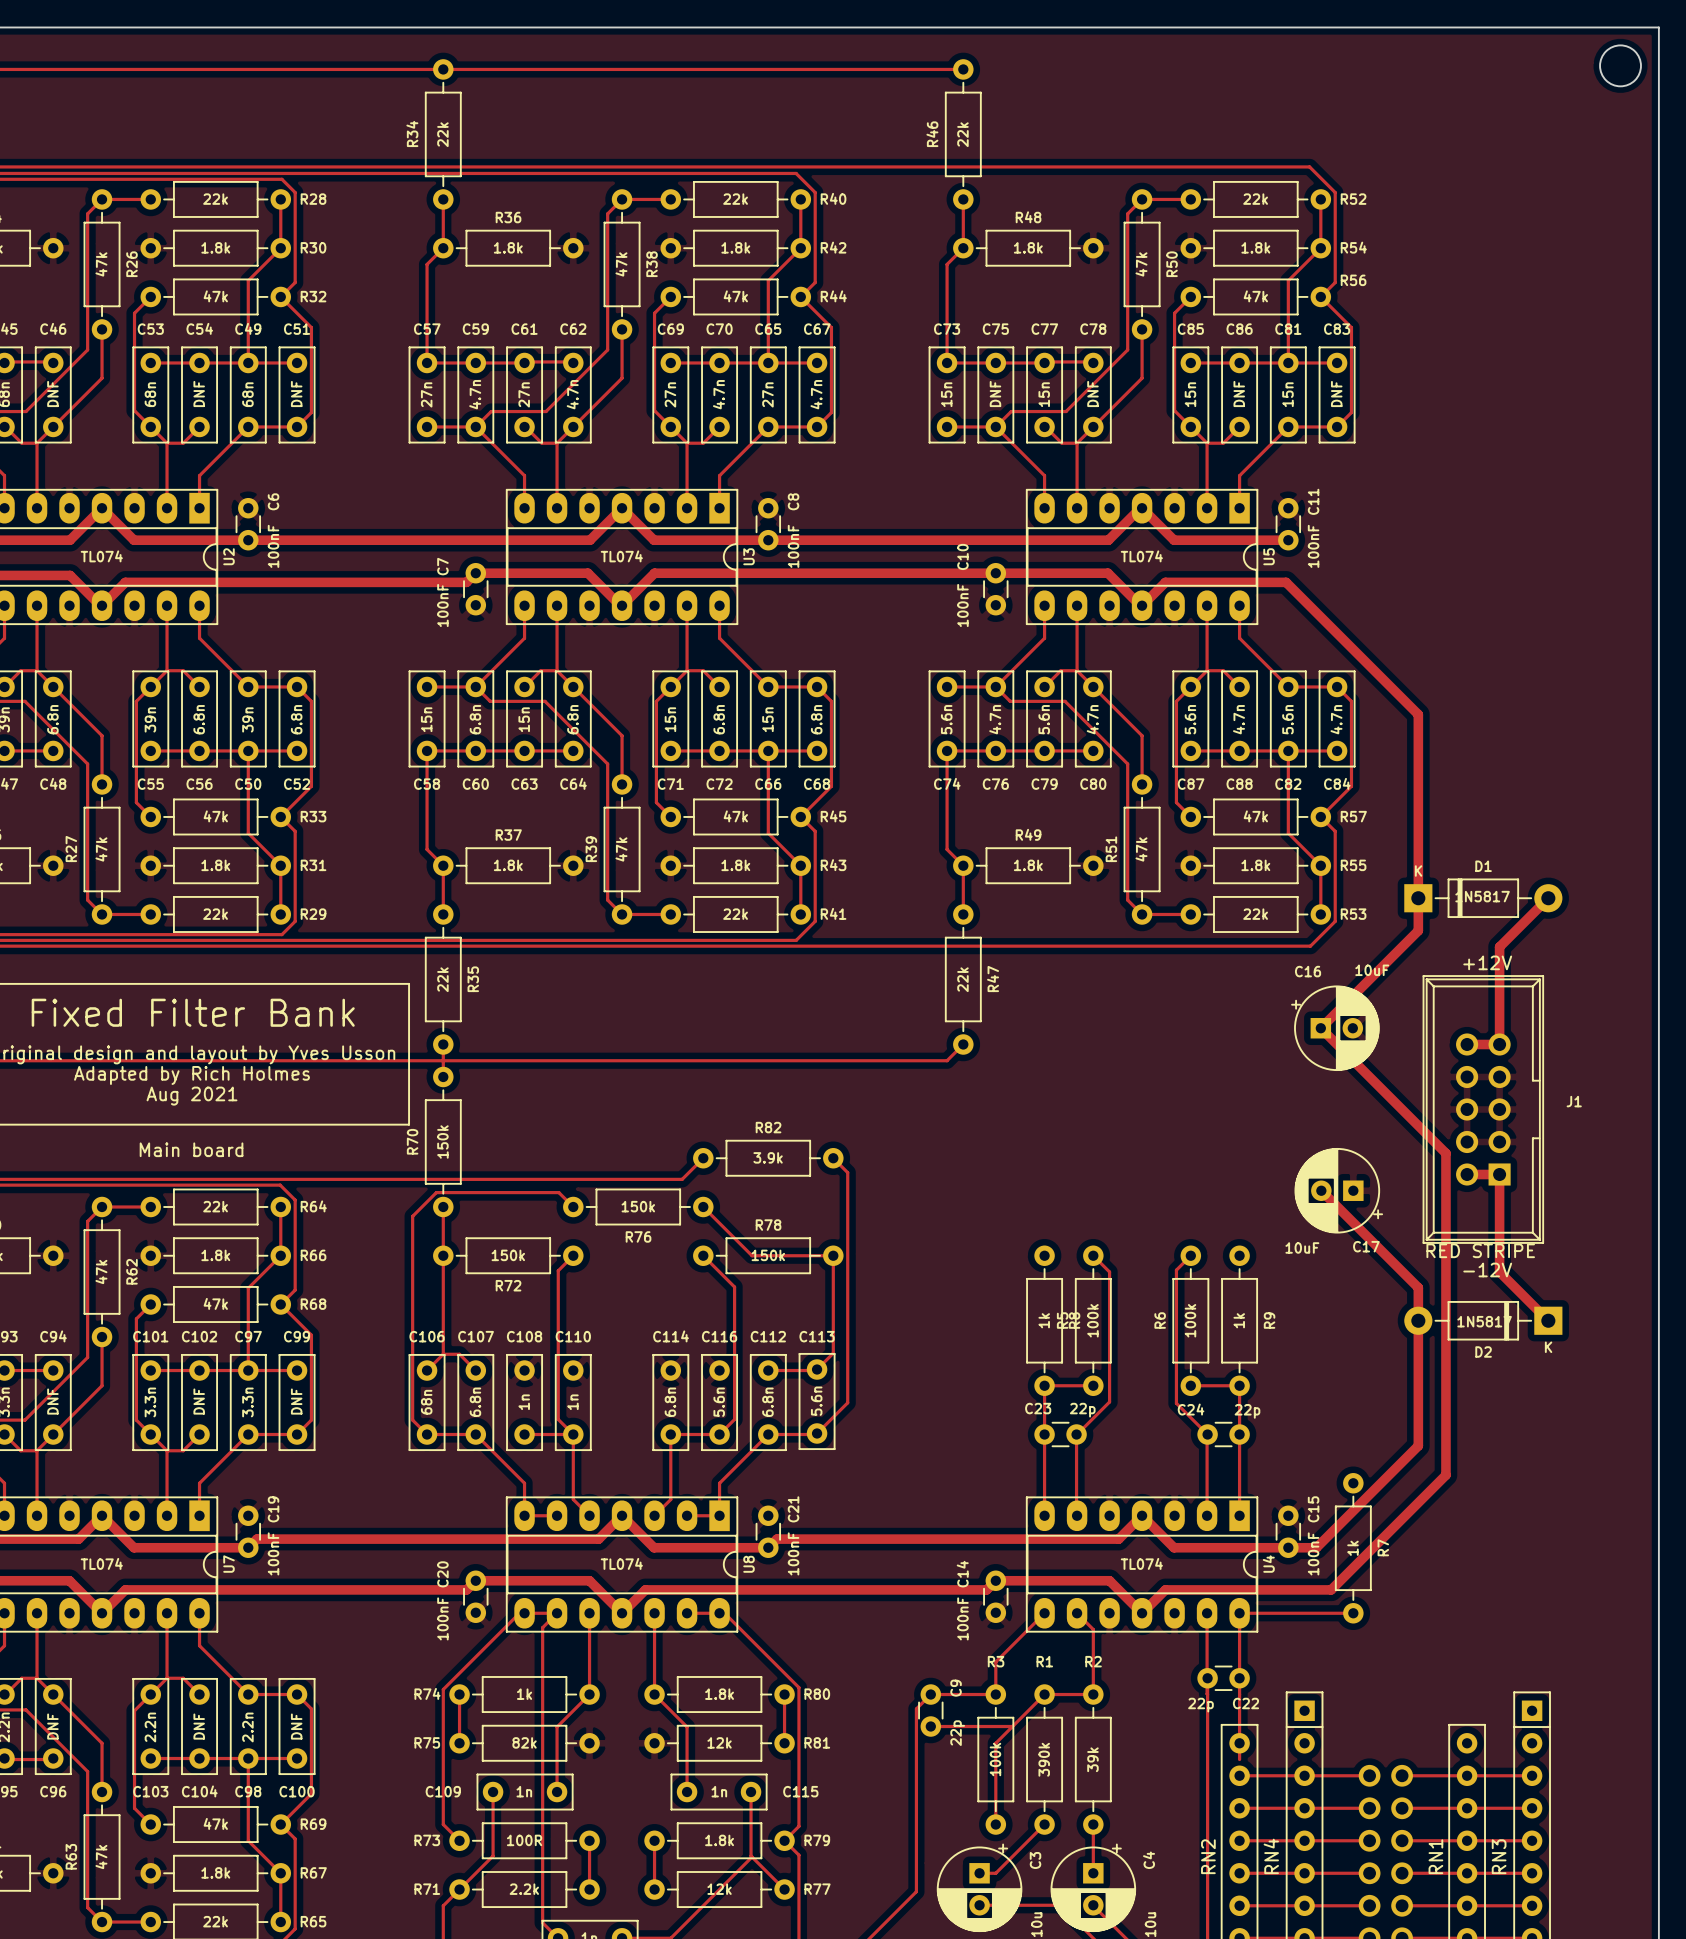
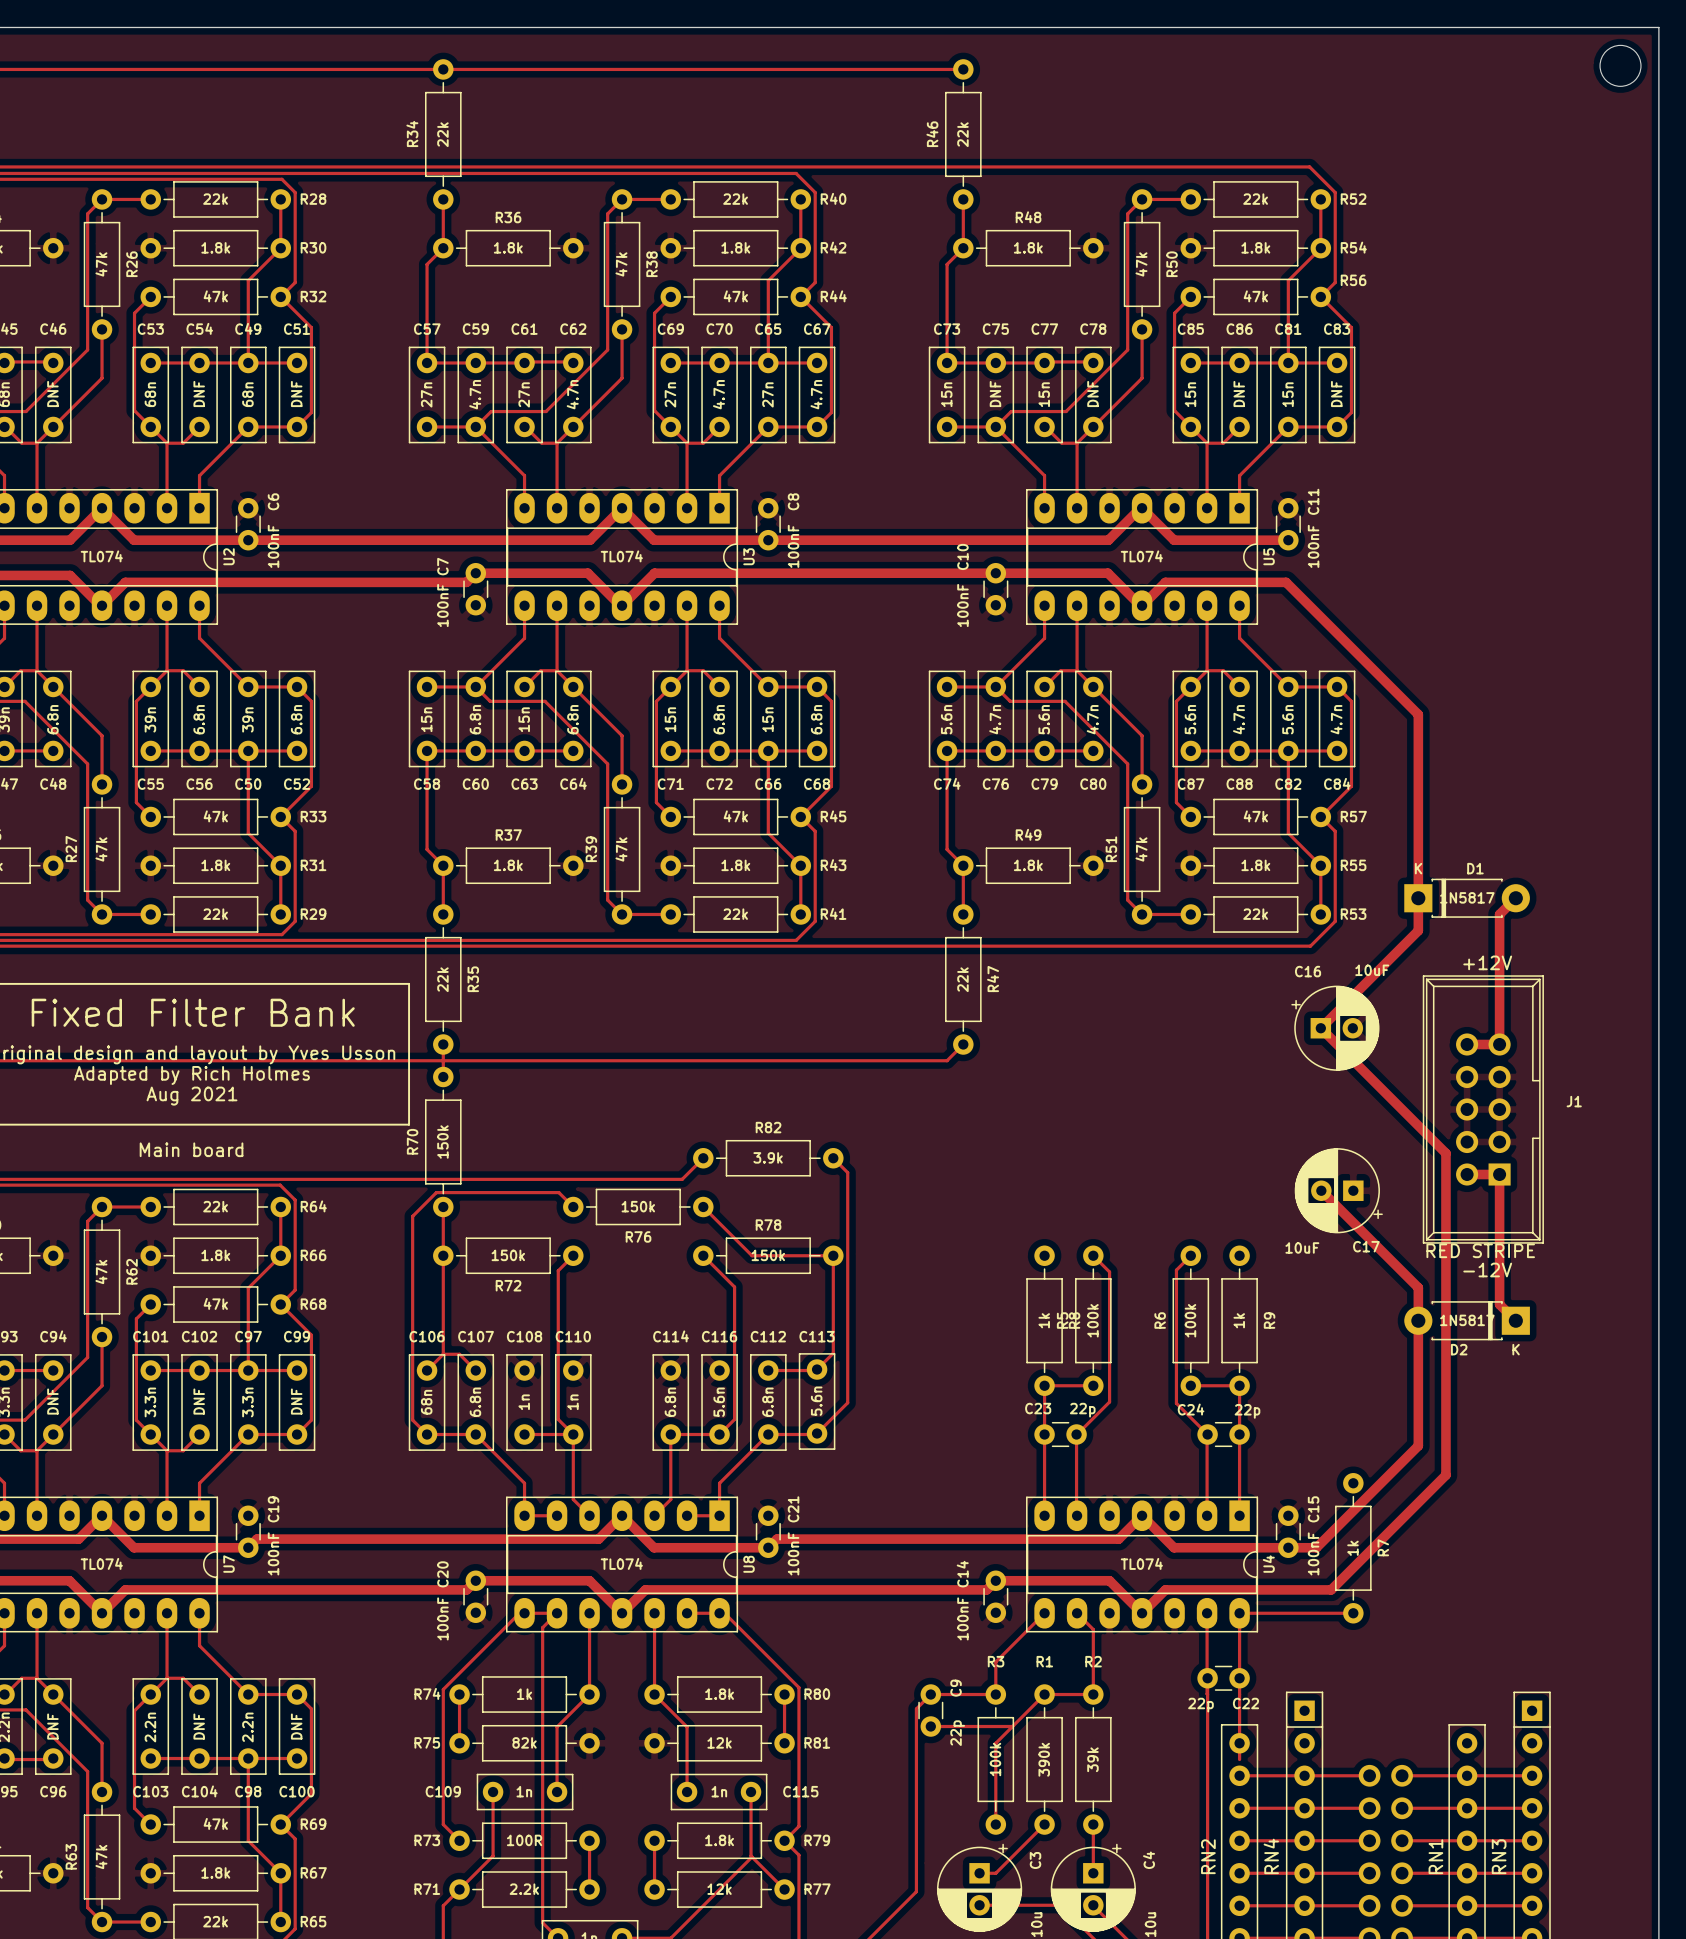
D1 footprint: [1404, 878, 1563, 918] -> [1404, 878, 1530, 918]
track: (1548, 898) (1499, 946) -> (1515, 898) (1499, 914) (1499, 946)
track: (1499, 1272) (1548, 1320) -> (1499, 1272) (1499, 1304) (1515, 1320)
D2 footprint: [1404, 1301, 1563, 1341] -> [1404, 1301, 1530, 1341]

